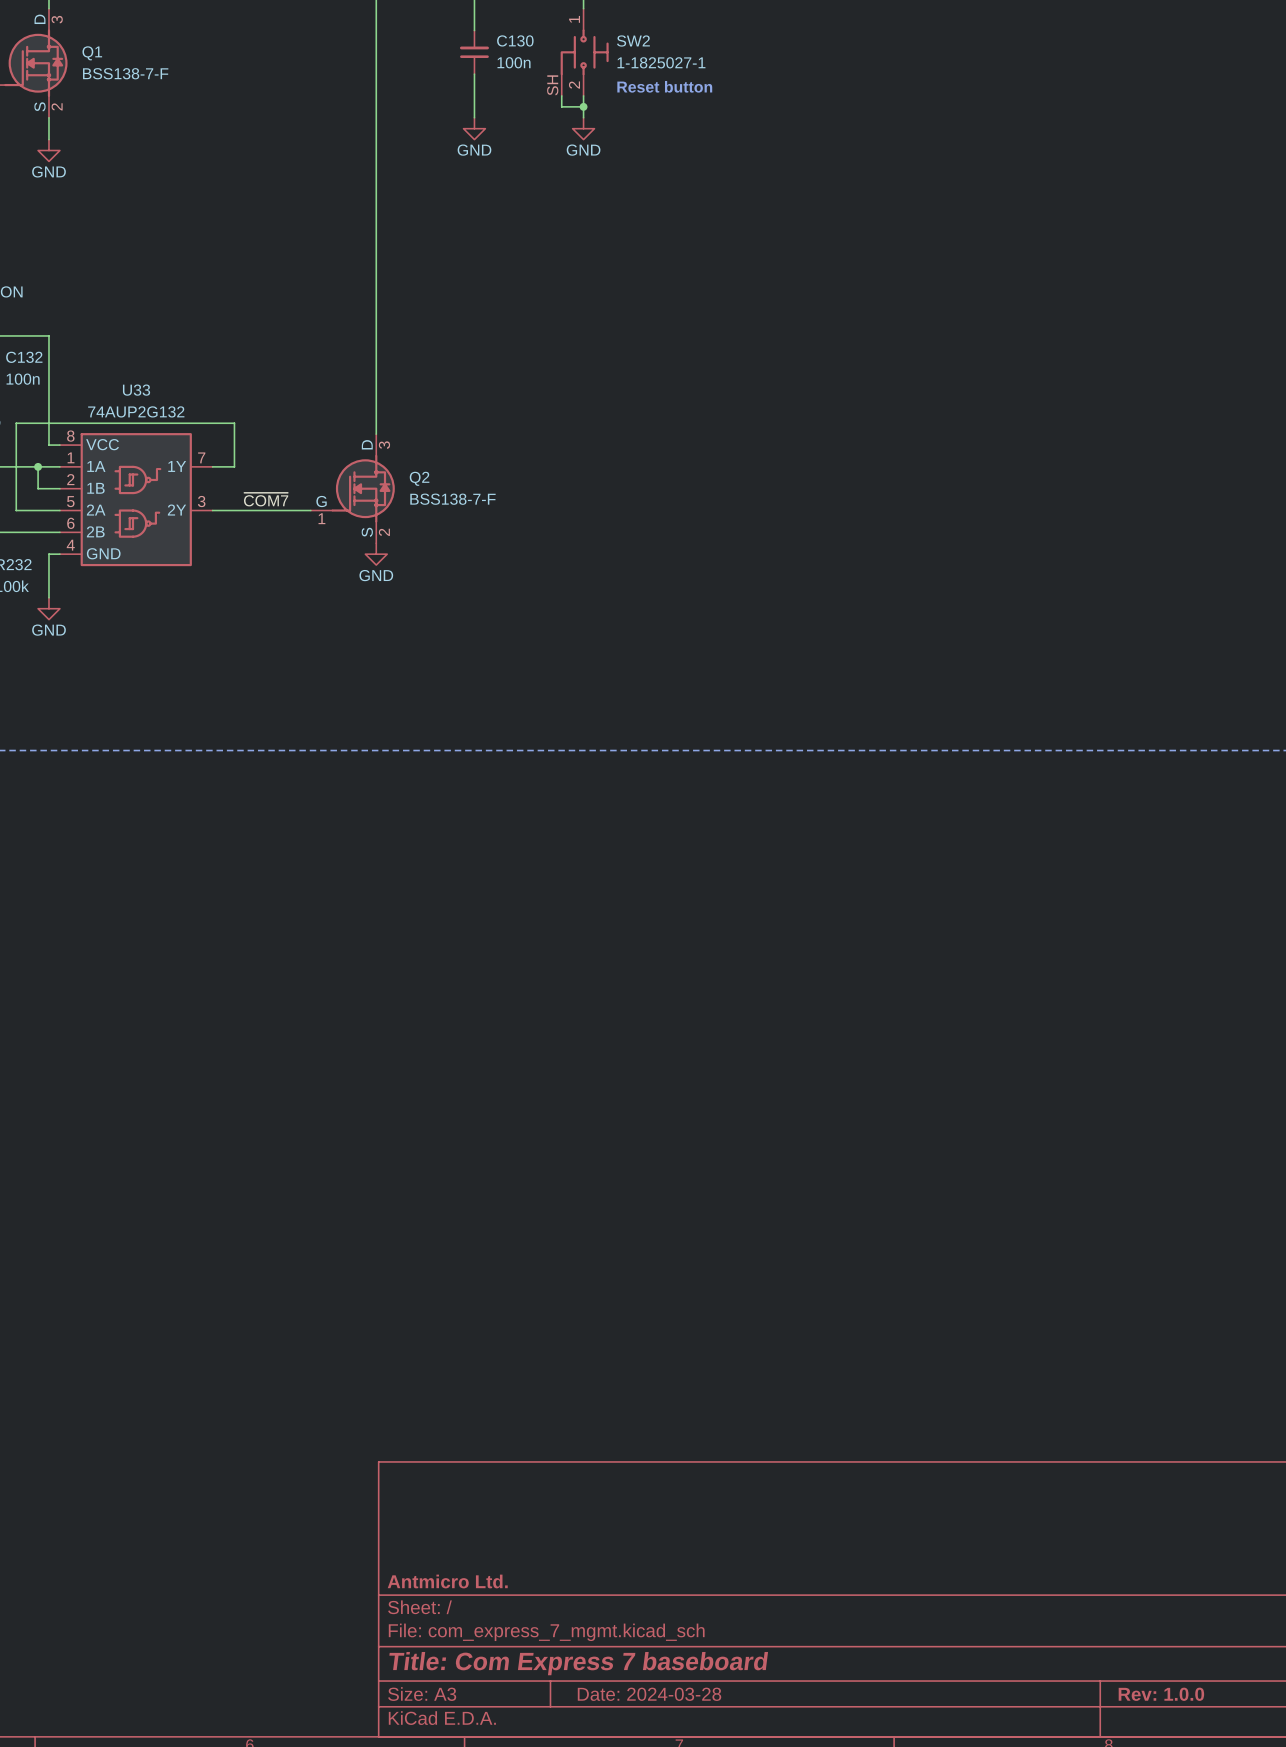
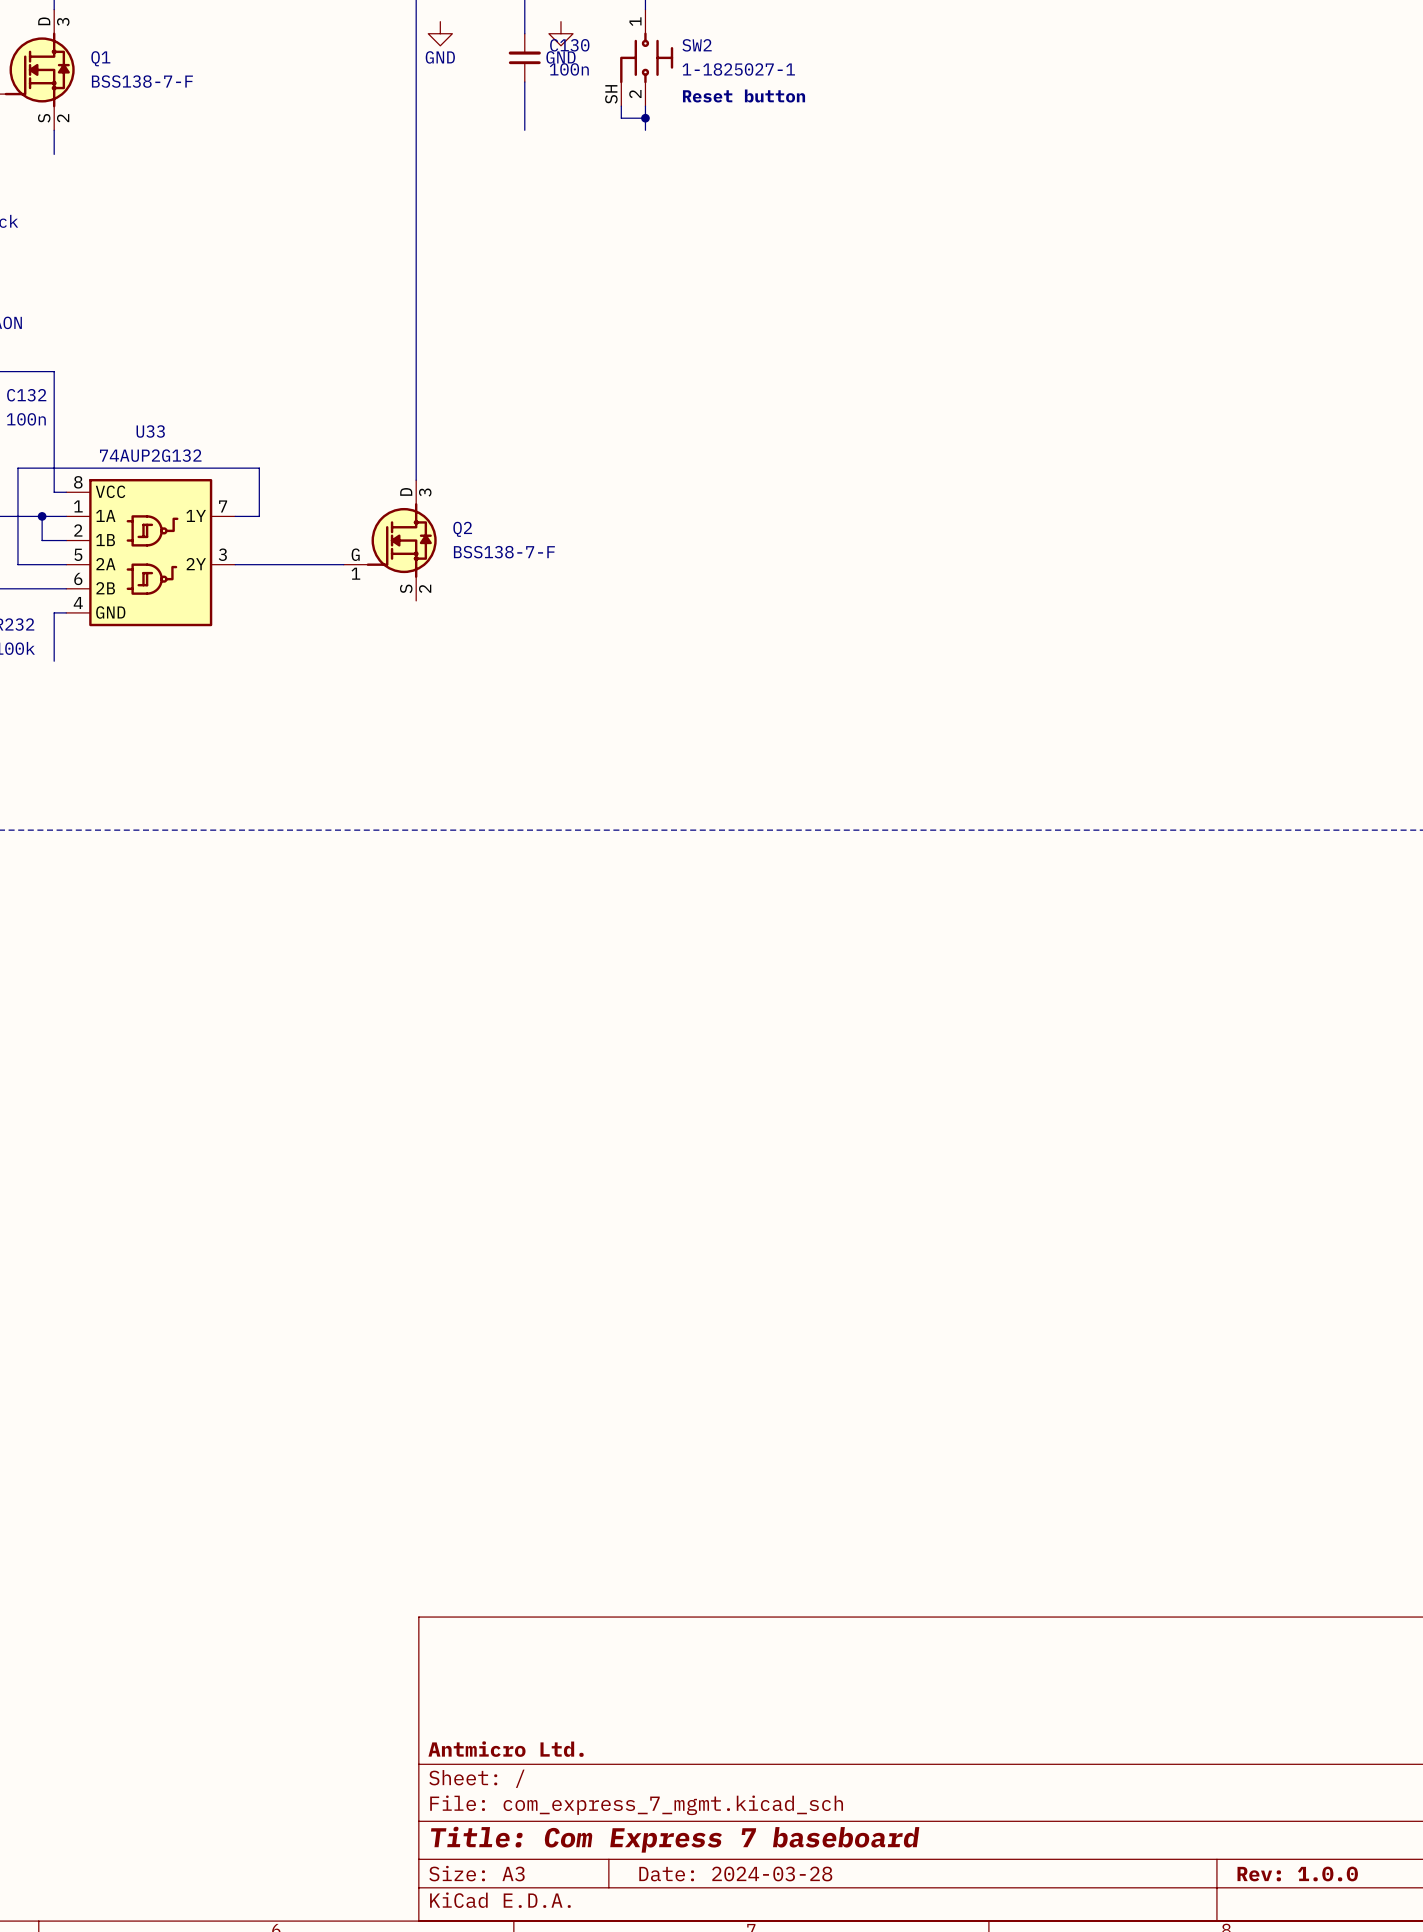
power symbol: none -> GND (440, 33)
power symbol: none -> GND (560, 33)
power symbol: GND (474, 128) -> none
power symbol: GND (583, 128) -> none
power symbol: GND (48, 150) -> none
label: ~{COM7} (266, 499) -> none
power symbol: GND (376, 554) -> none
power symbol: GND (48, 608) -> none

